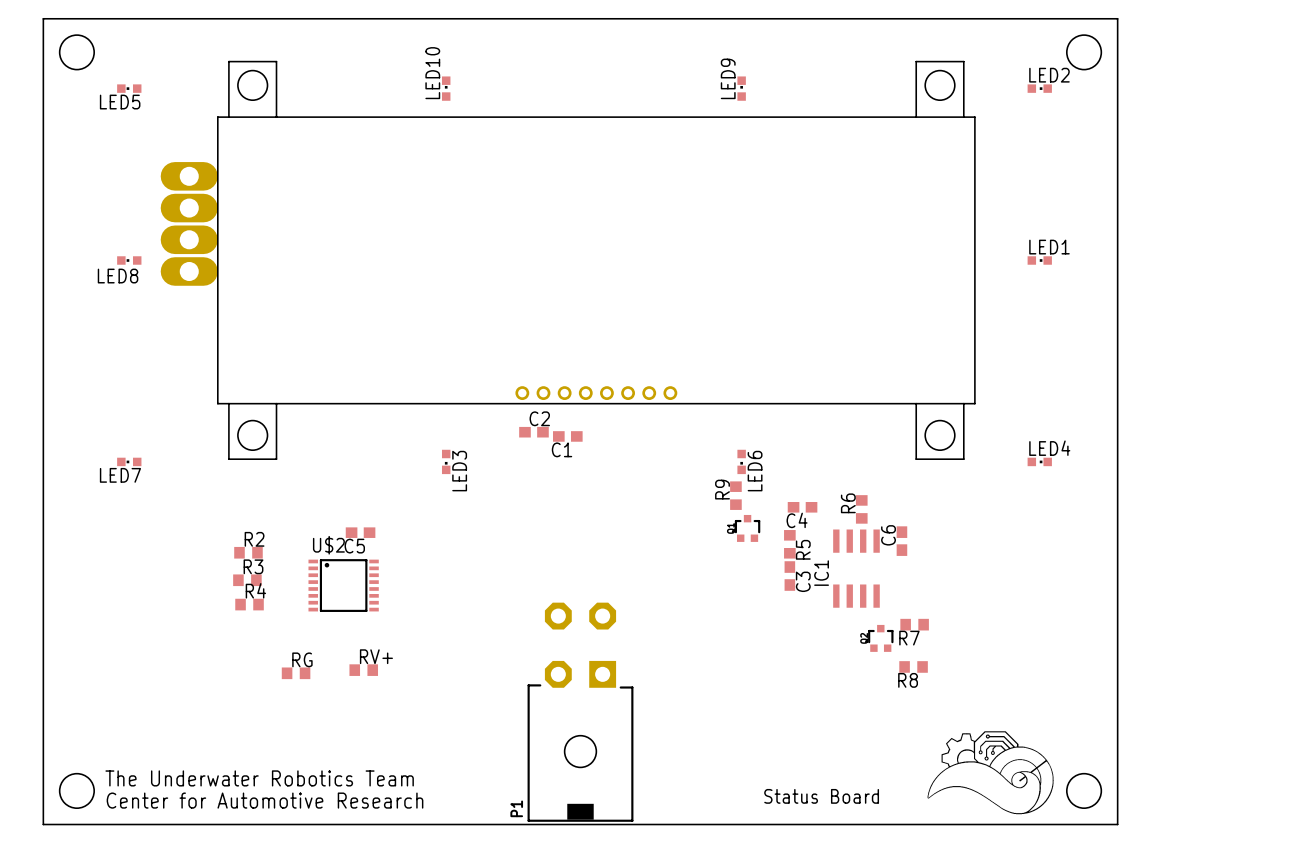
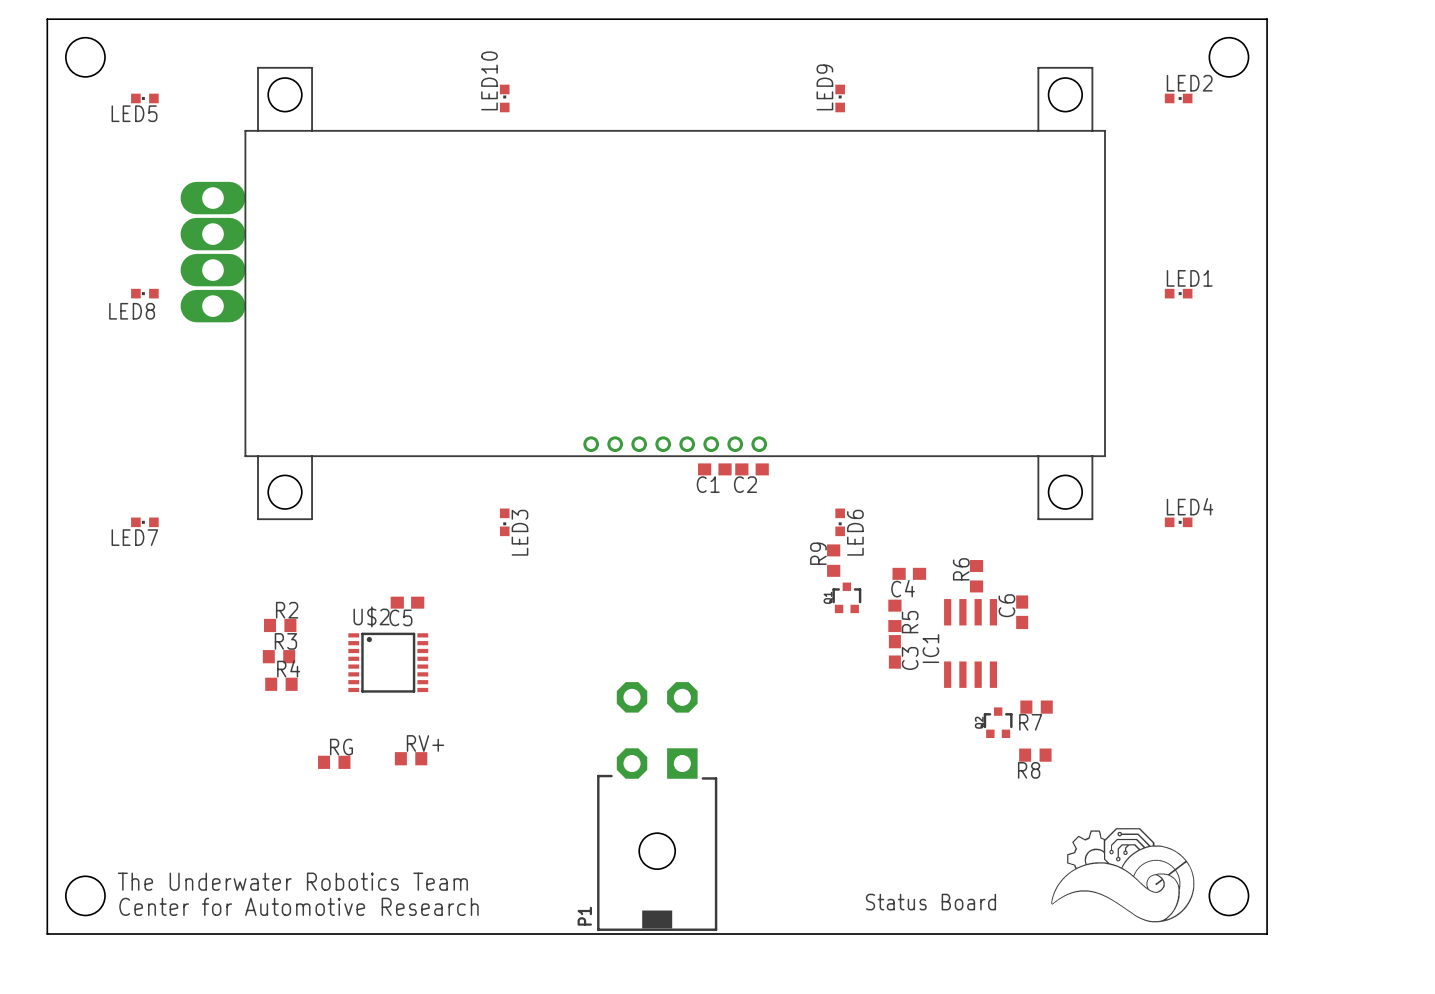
C2 name position: C2 (539, 418) -> C2 (745, 484)
C2 position: (533, 432) -> (752, 469)
C1 position: (567, 436) -> (714, 469)

